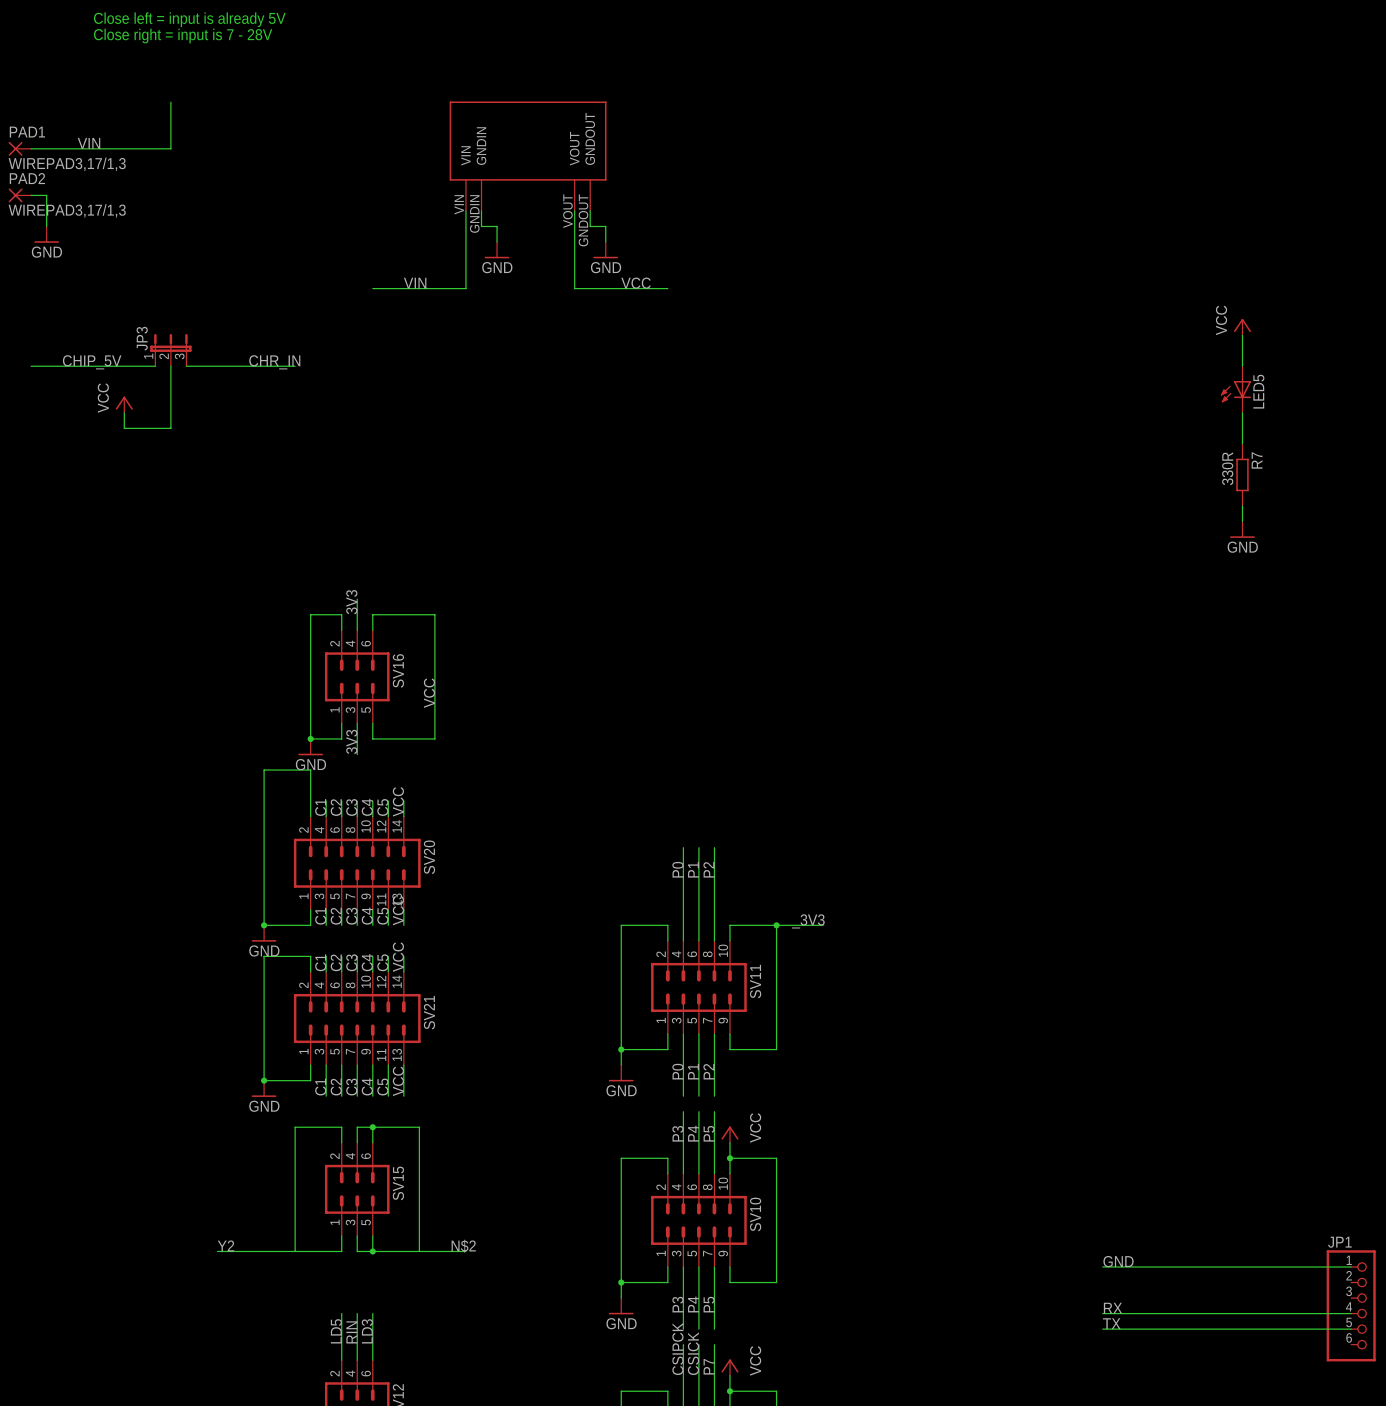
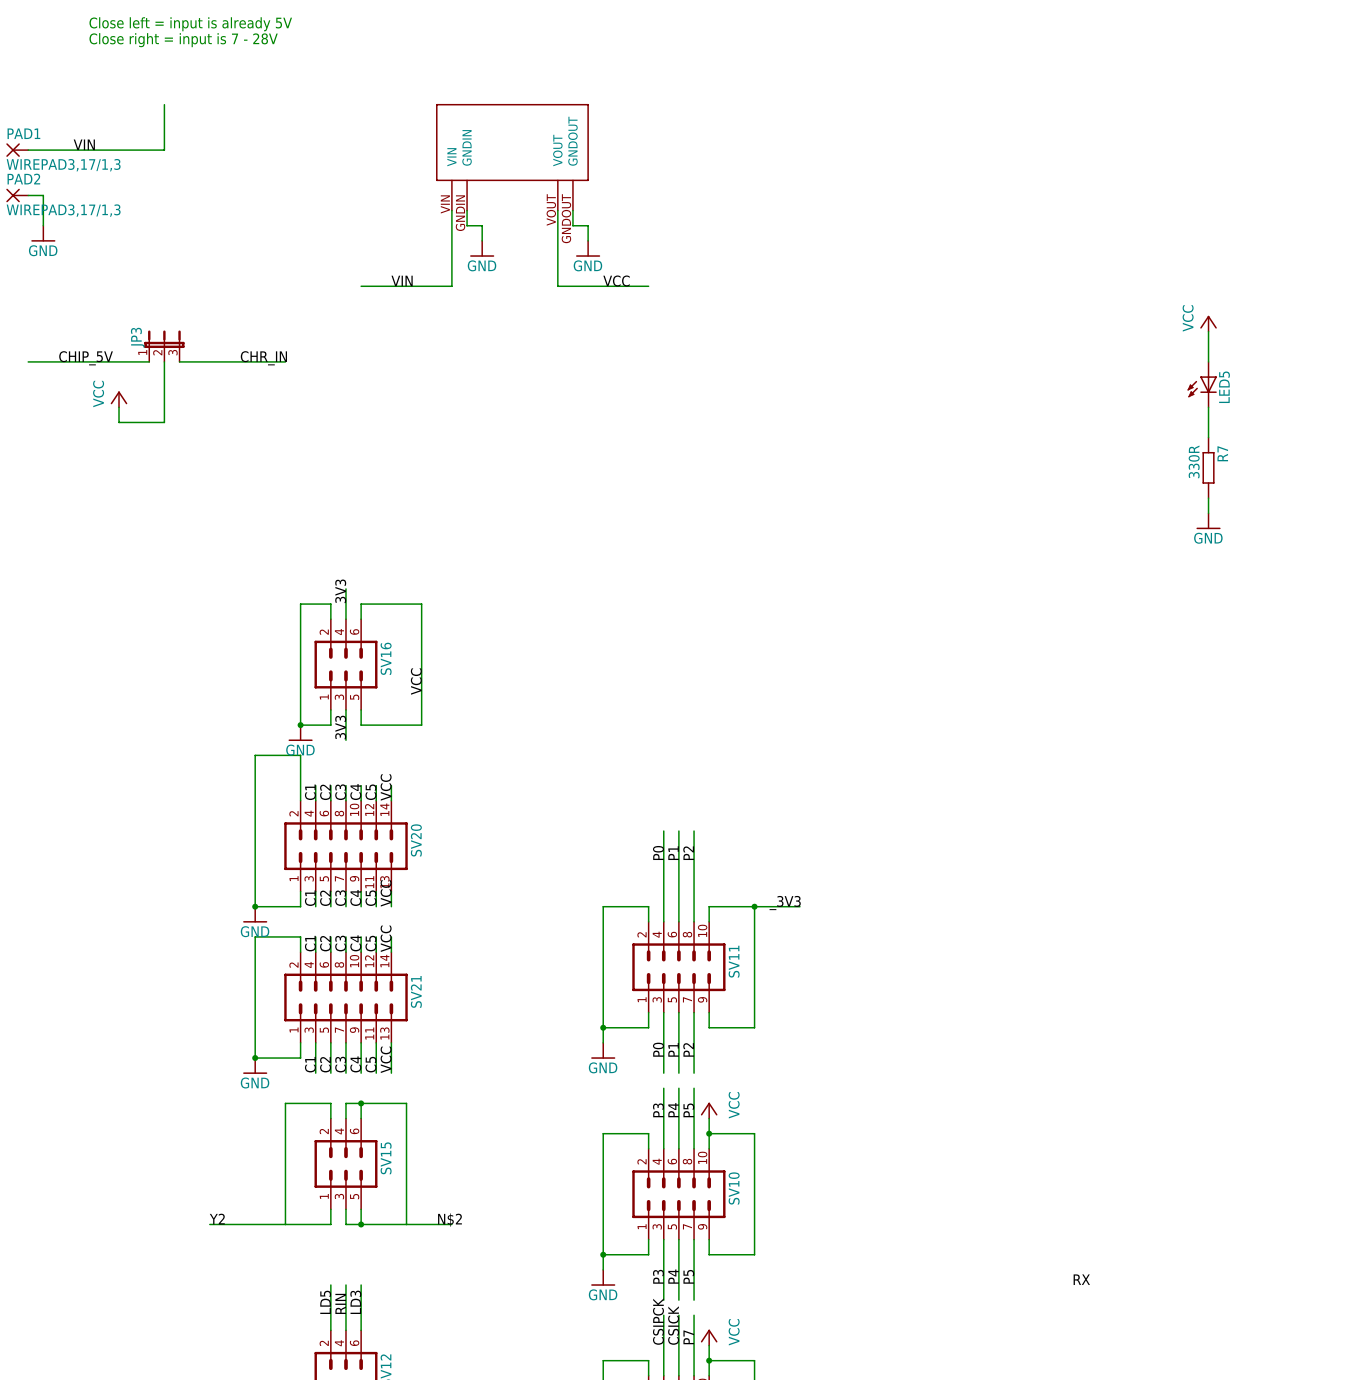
label: GND (1118, 1261) -> none
wire: (1102, 1267) (1351, 1267) -> none
JP1: (1351, 1305) -> none
wire: (1102, 1313) (1351, 1313) -> none
label: TX (1111, 1323) -> none
wire: (1102, 1329) (1351, 1329) -> none

